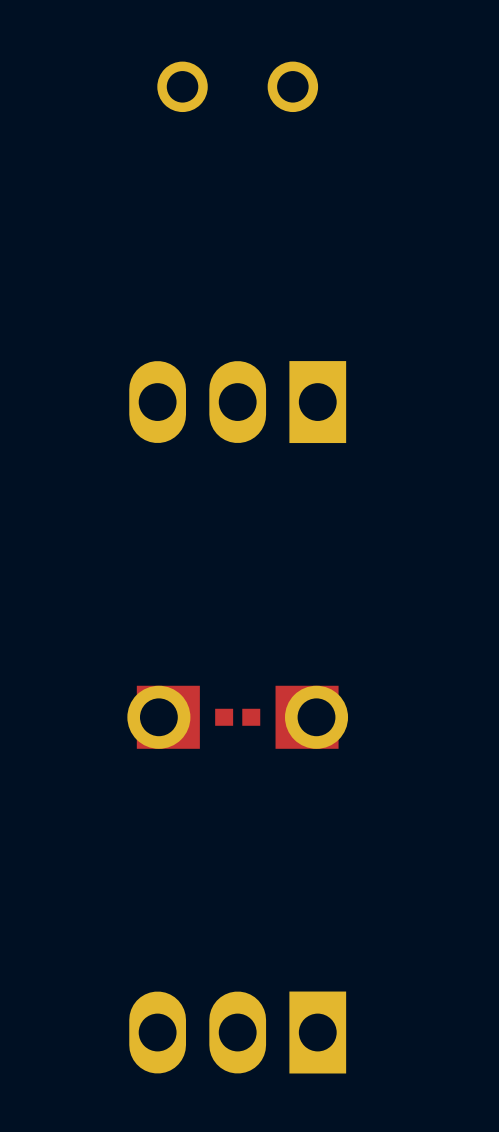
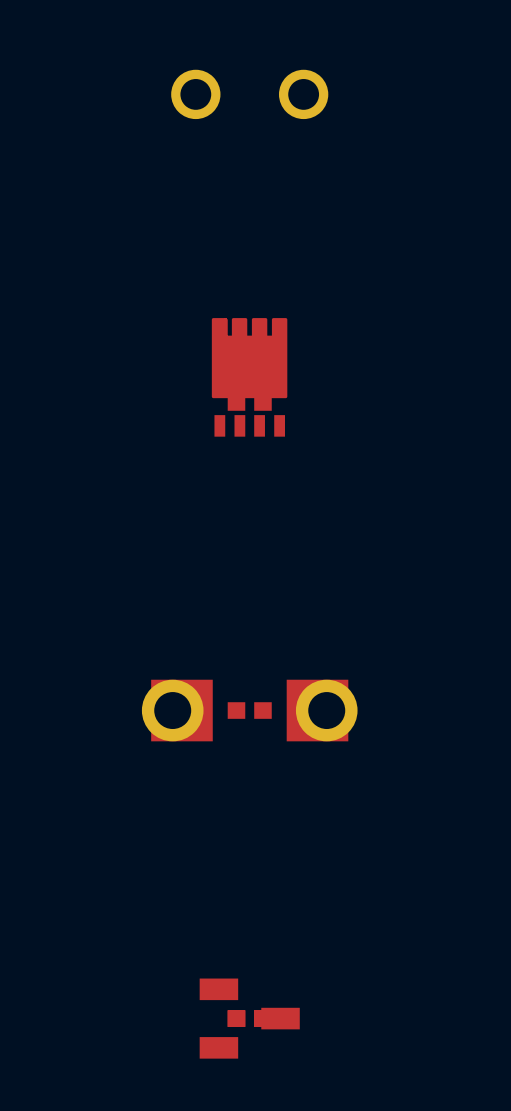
part footprint: [129, 361, 347, 444] -> [211, 318, 288, 437]
part footprint: [129, 991, 347, 1074] -> [199, 978, 300, 1059]

